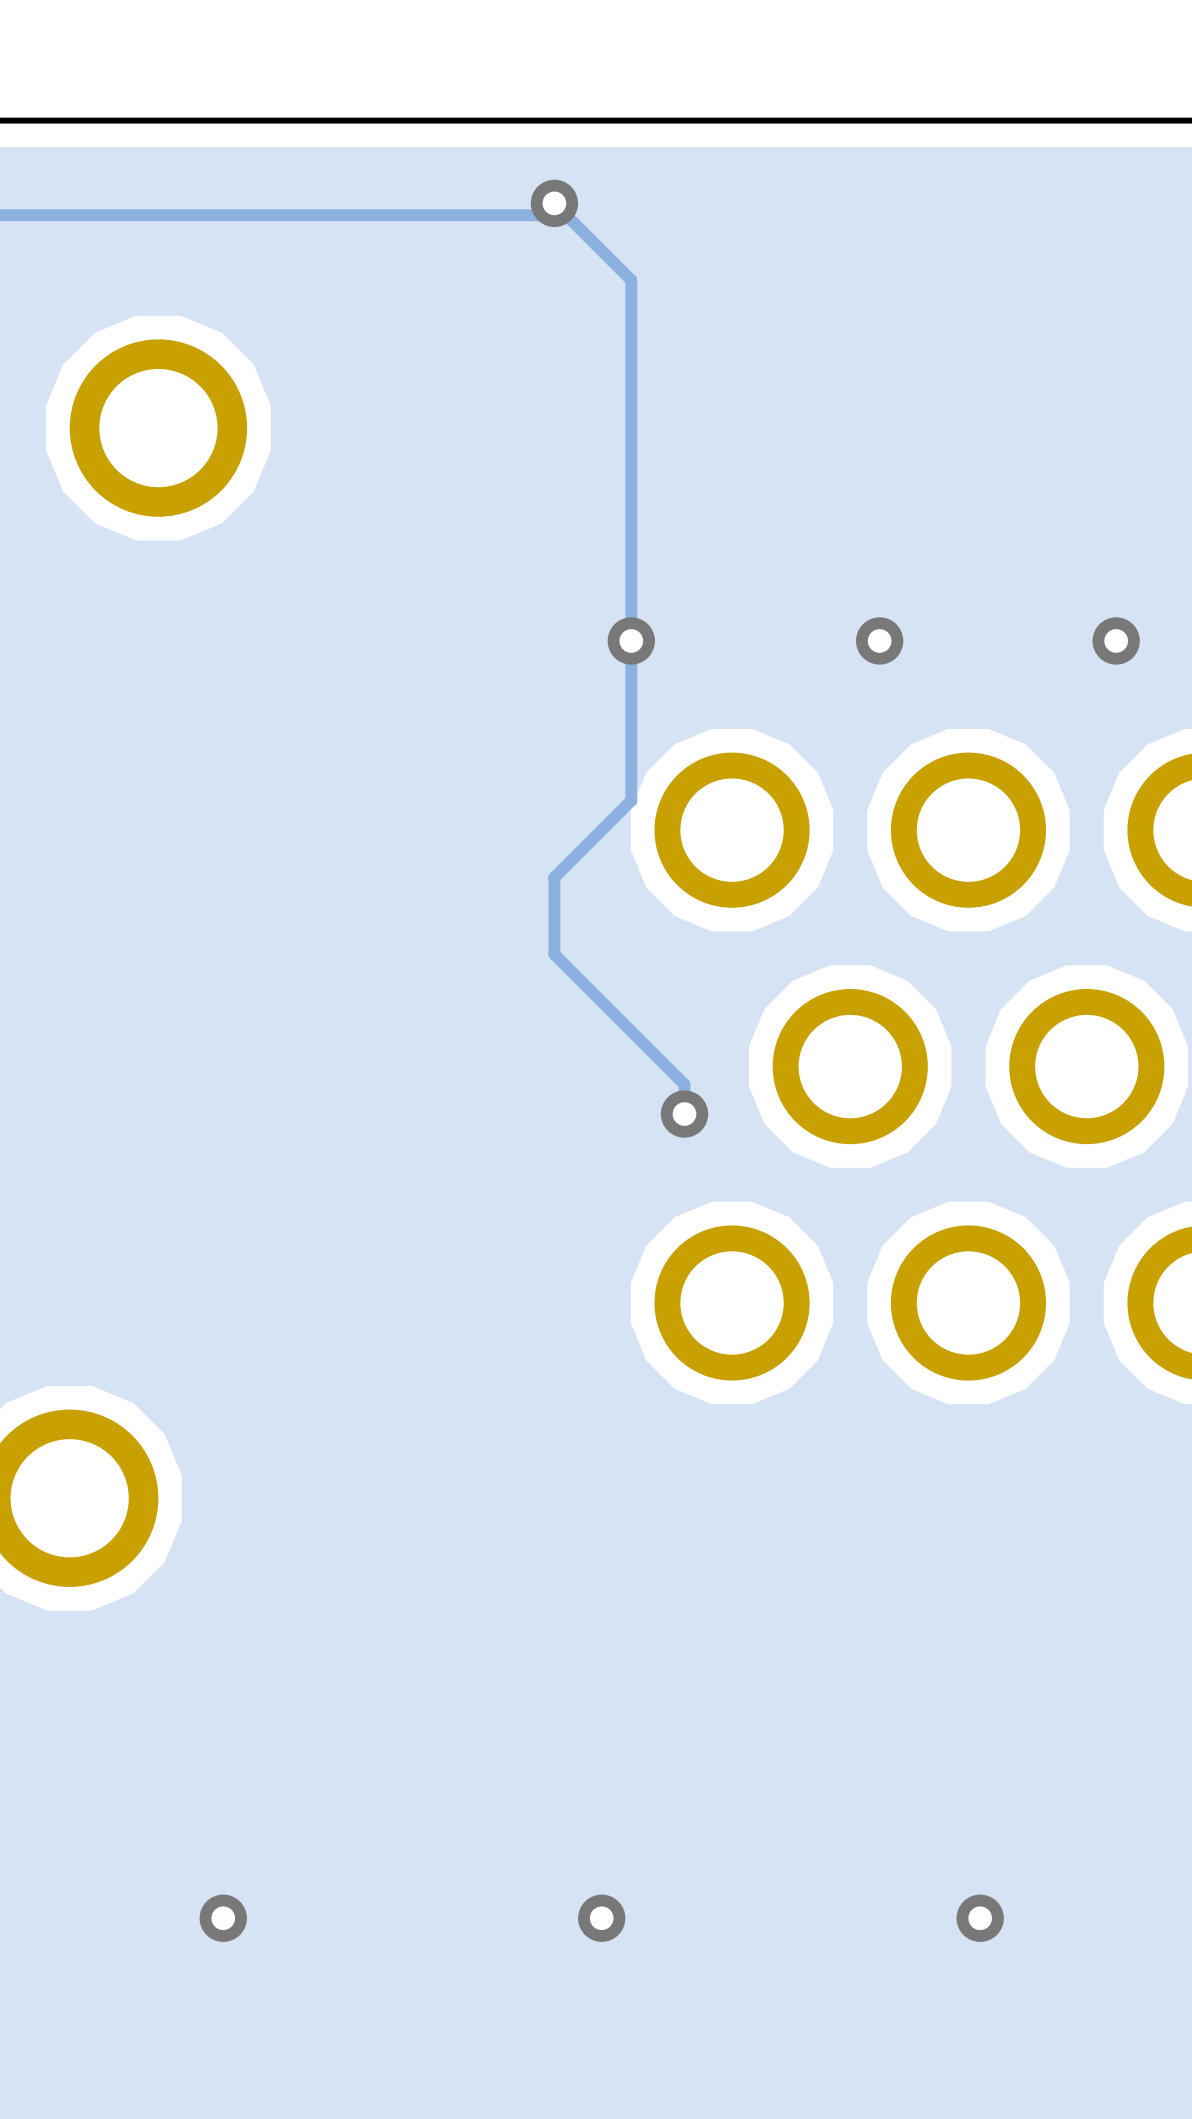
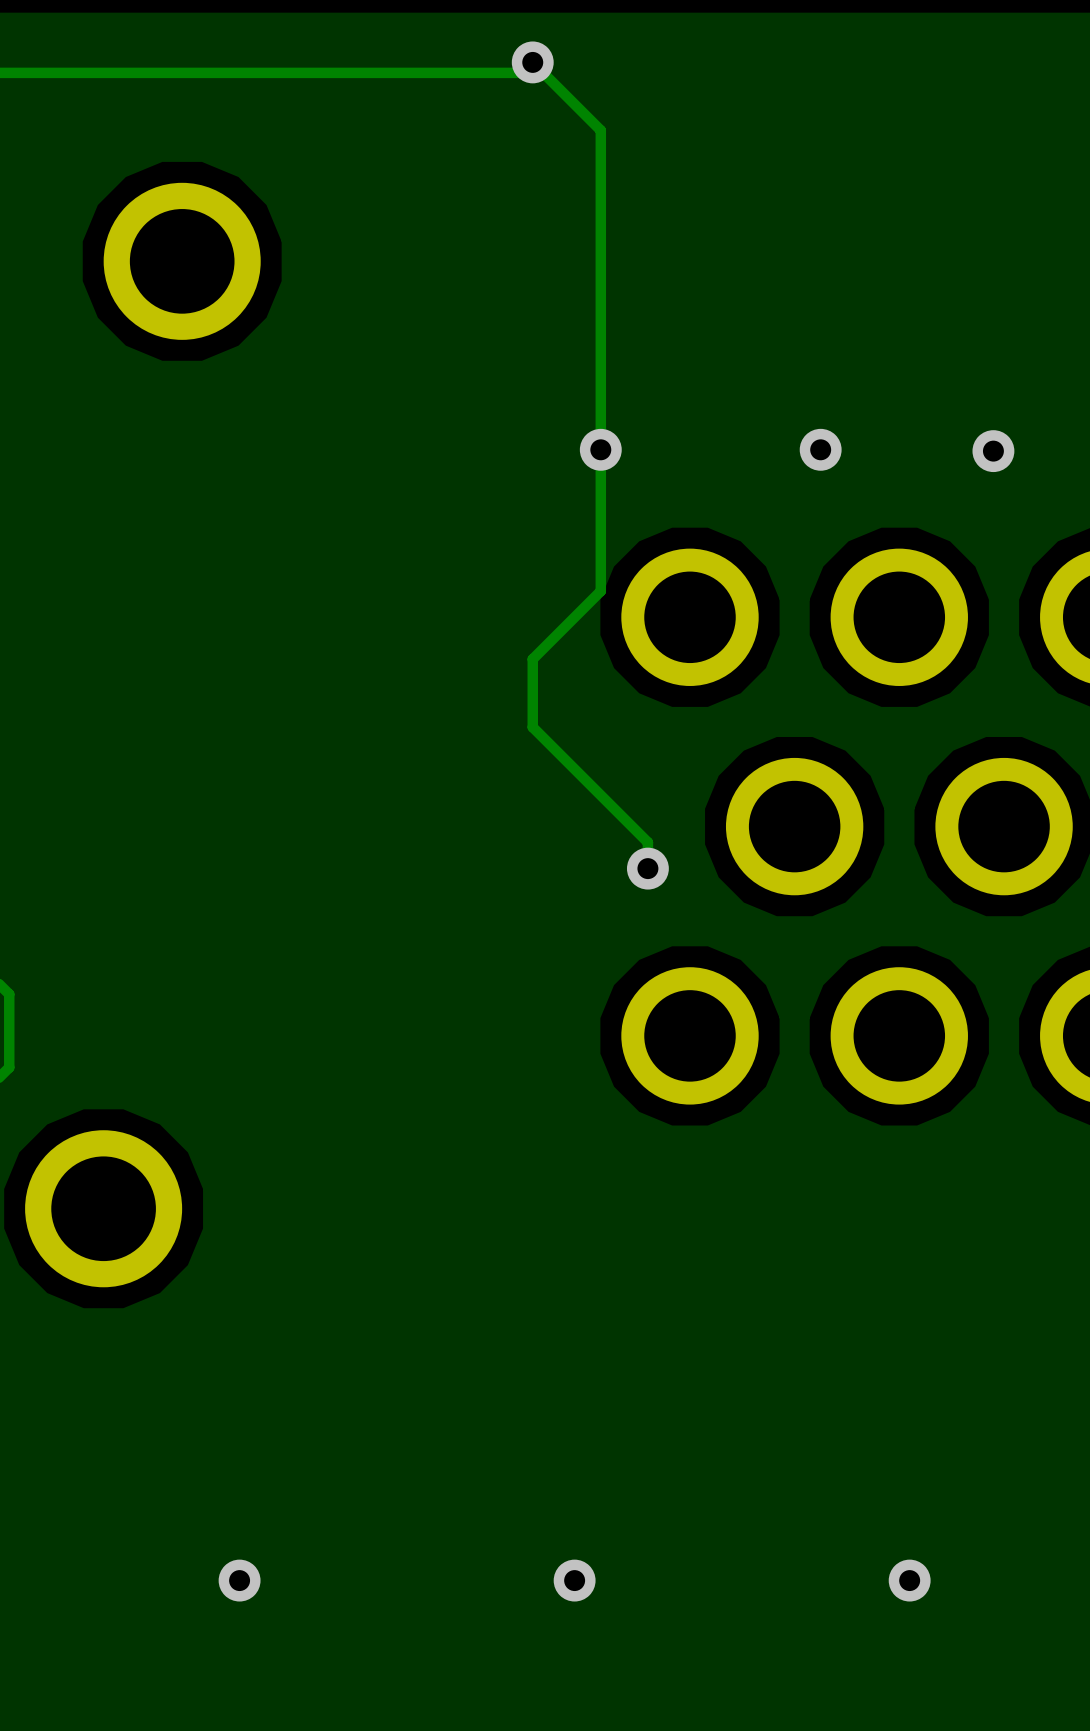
via position: (1116, 640) -> (993, 451)

